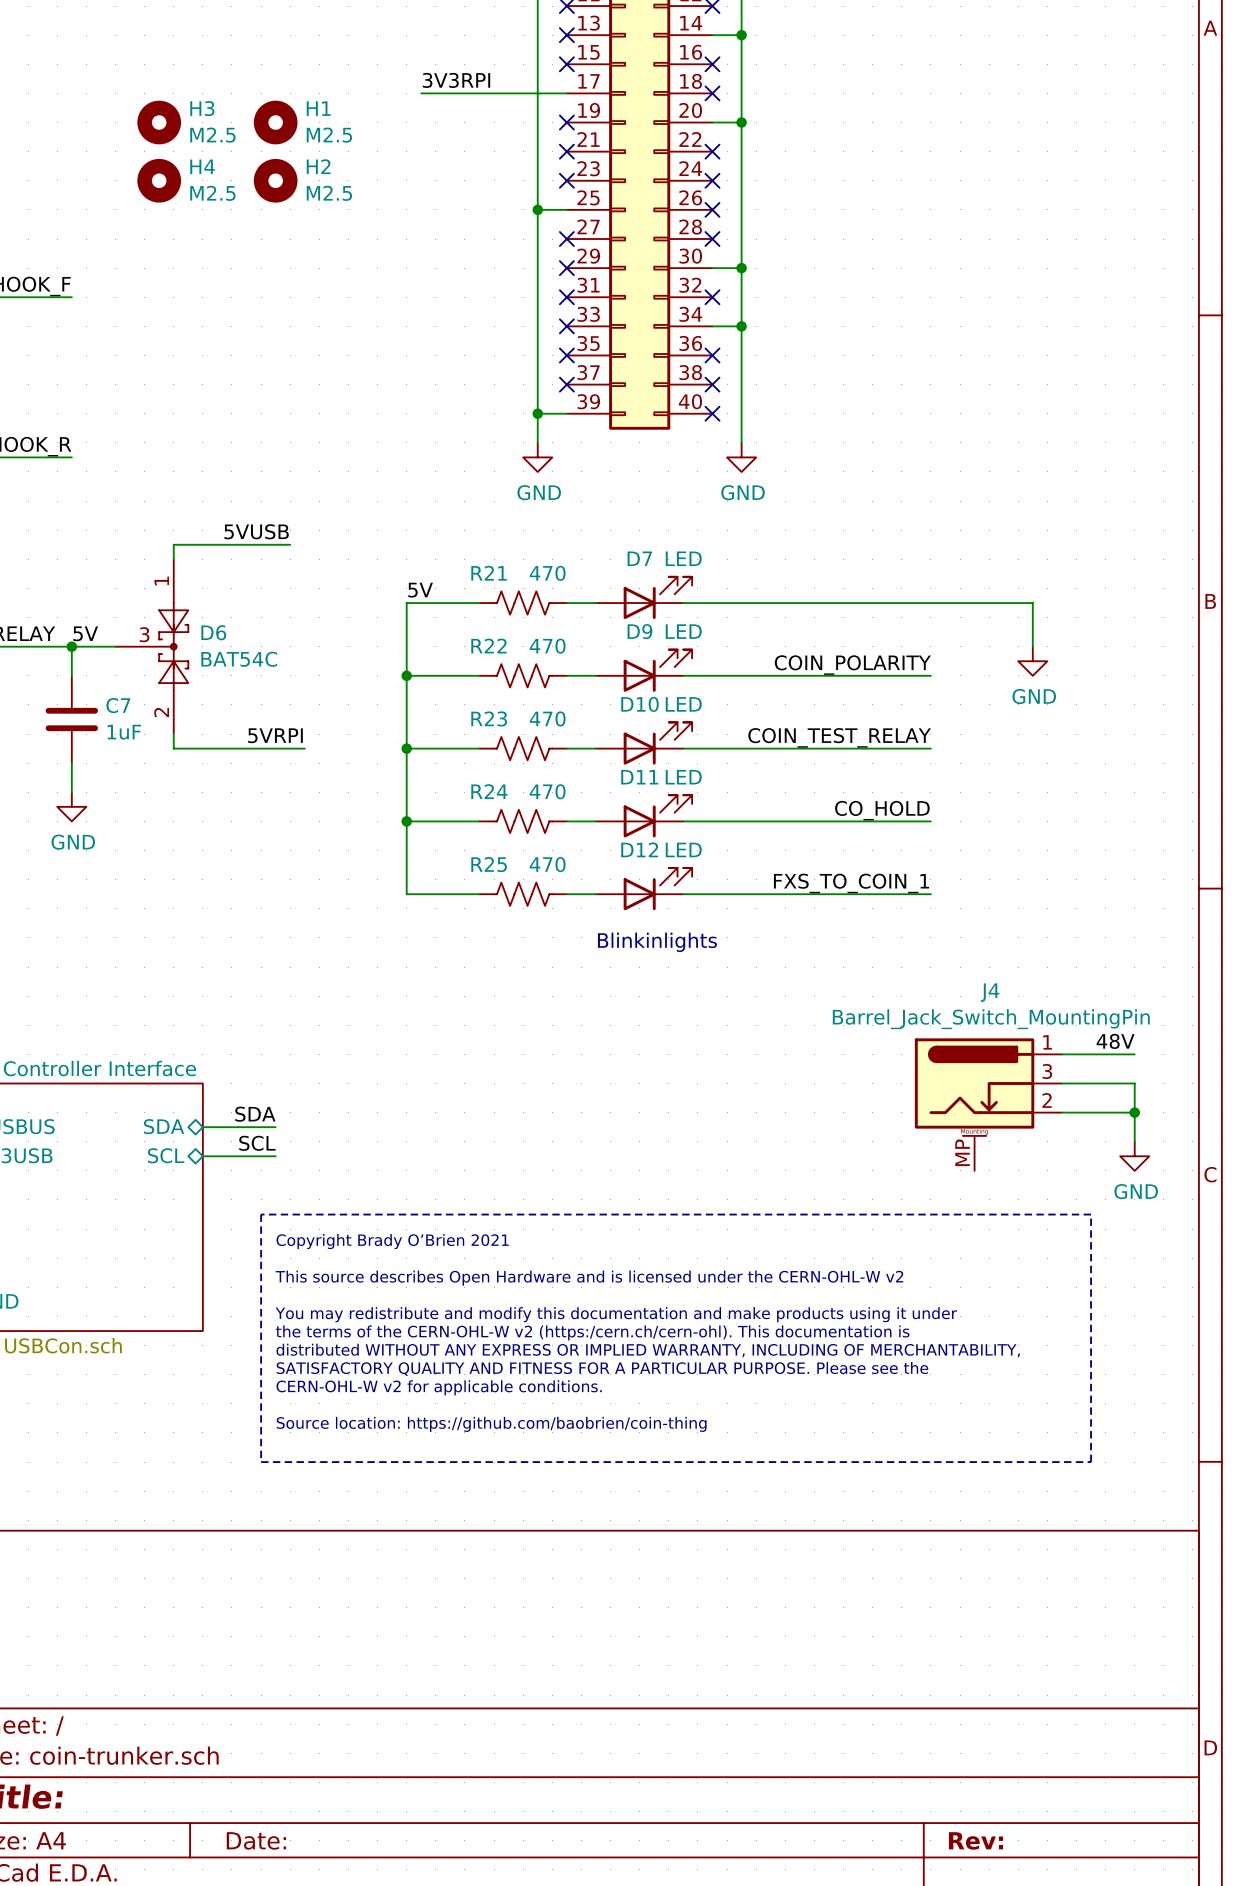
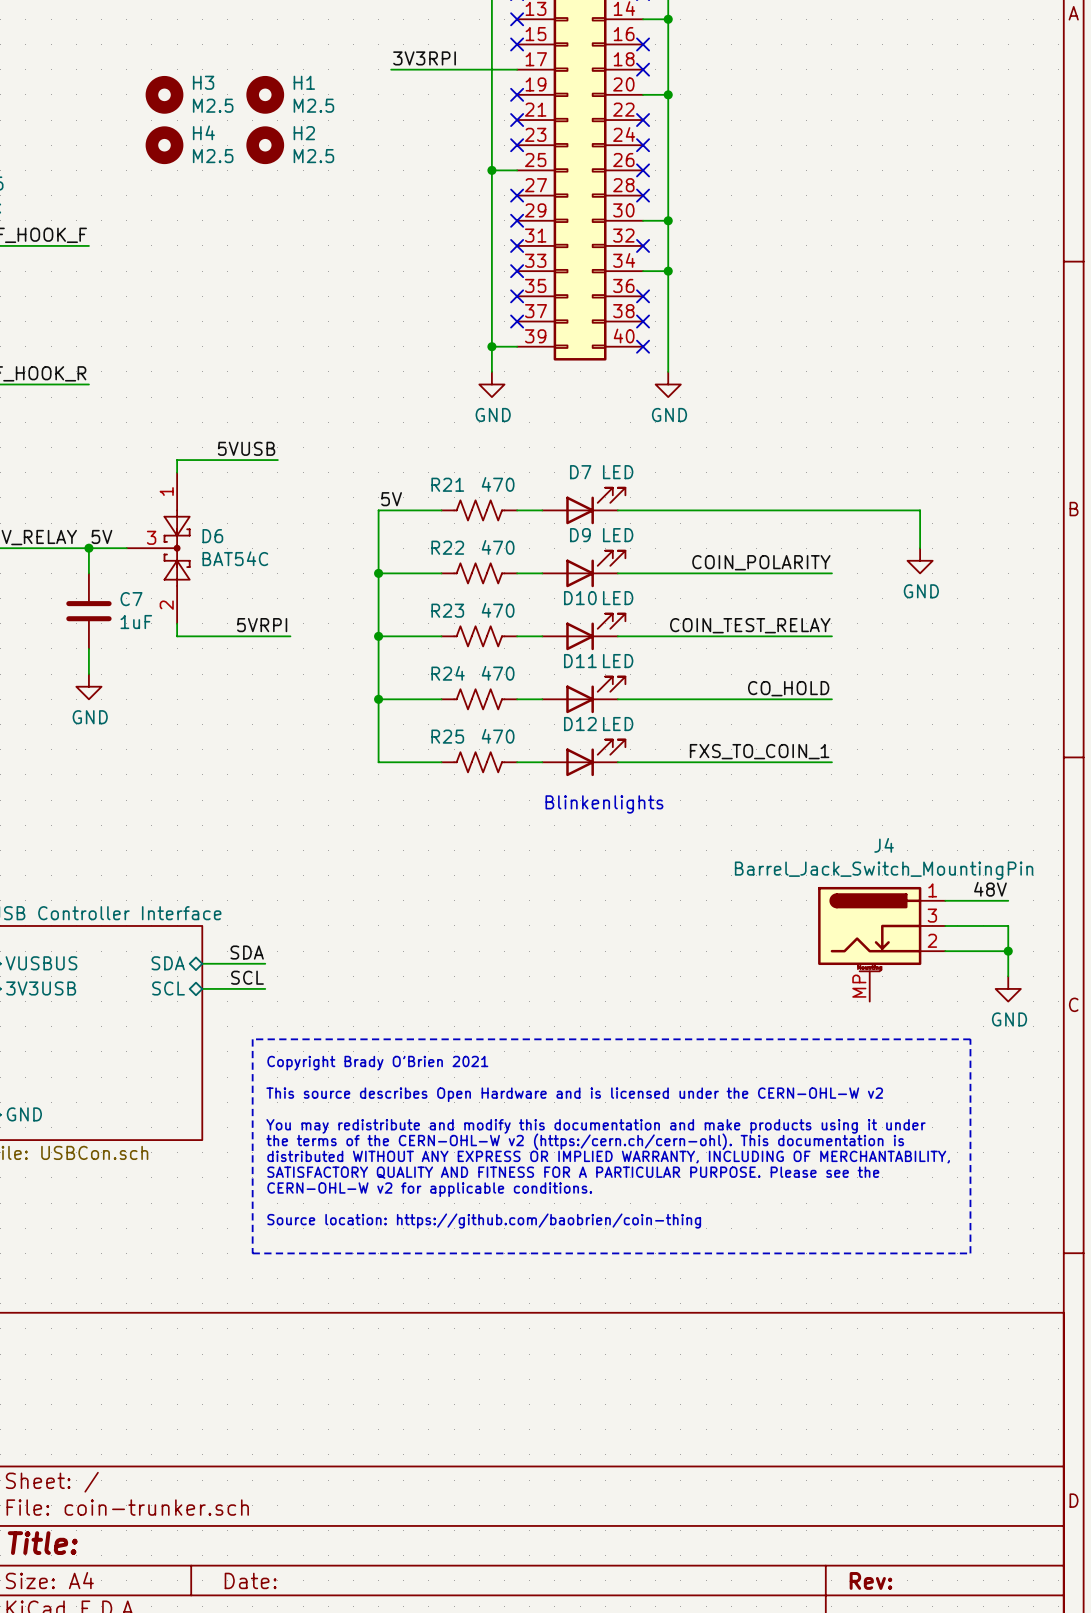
text: Blinkinlights (657, 942) -> Blinkenlights (604, 804)

